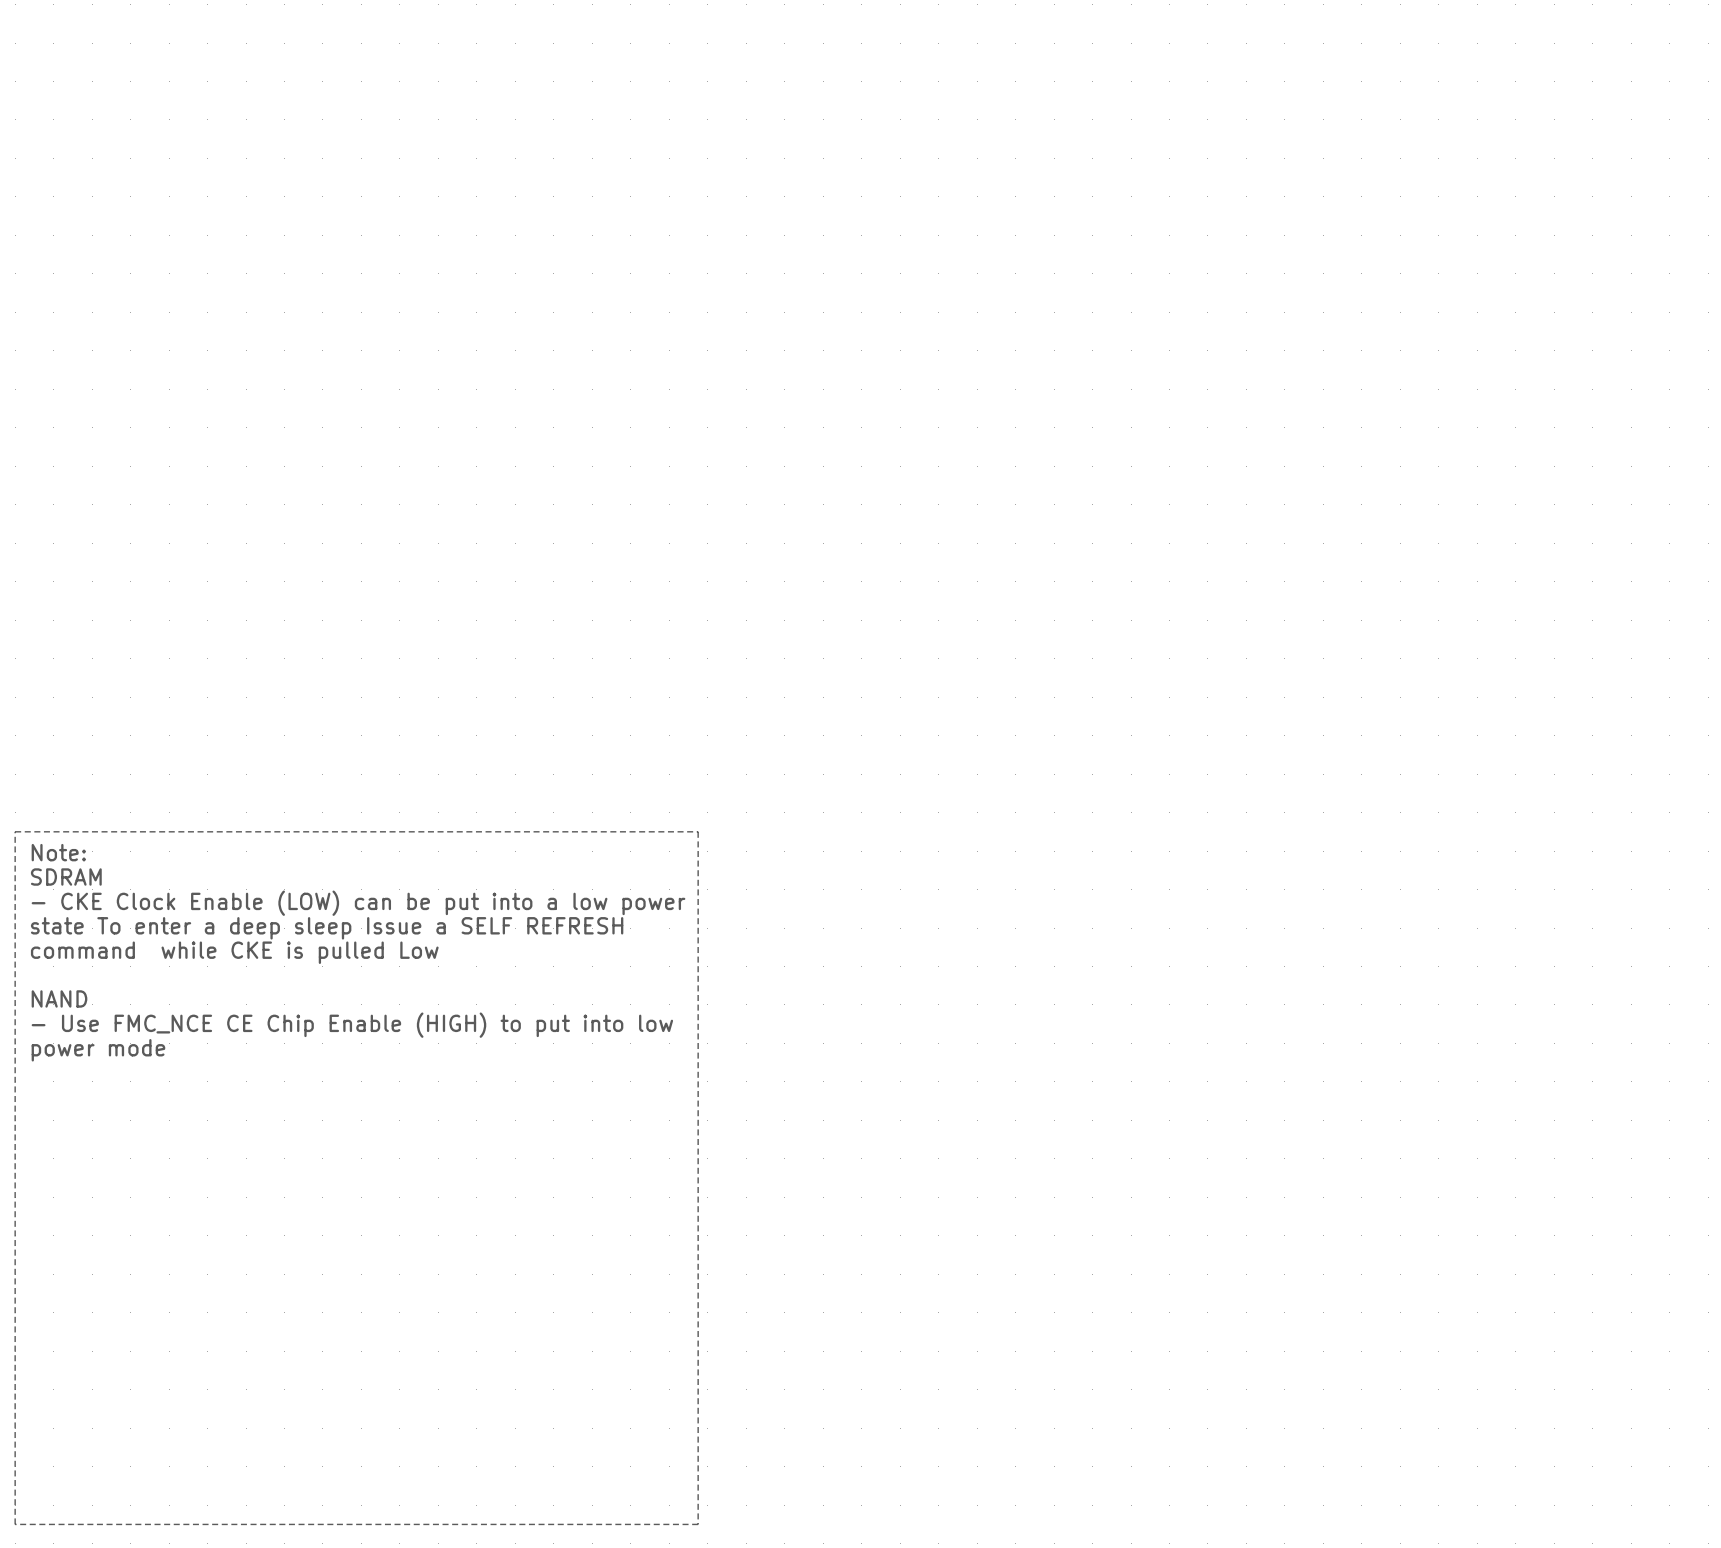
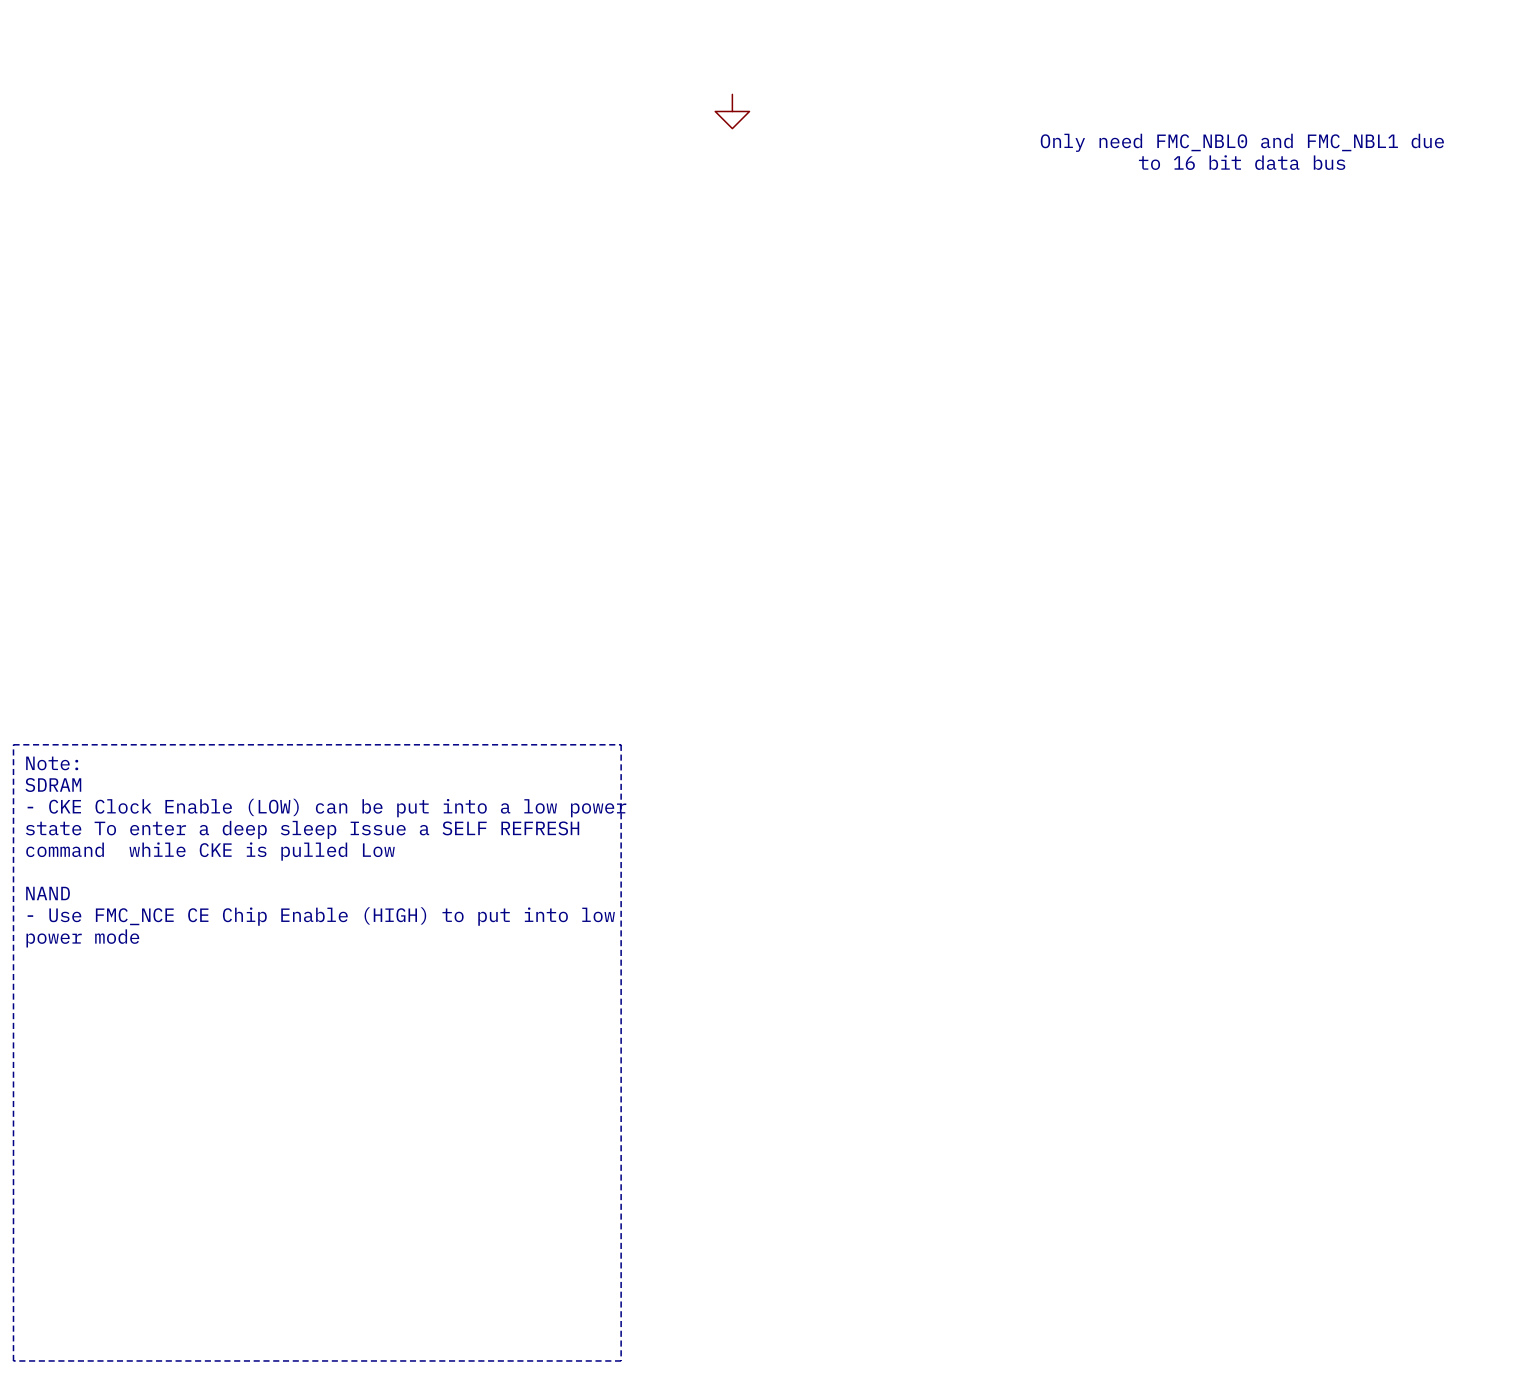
power symbol: none -> (732, 111)
text: none -> Only need FMC_NBL0 and FMC_NBL1 due (1242, 142)
text: none -> to 16 bit data bus (1242, 162)

